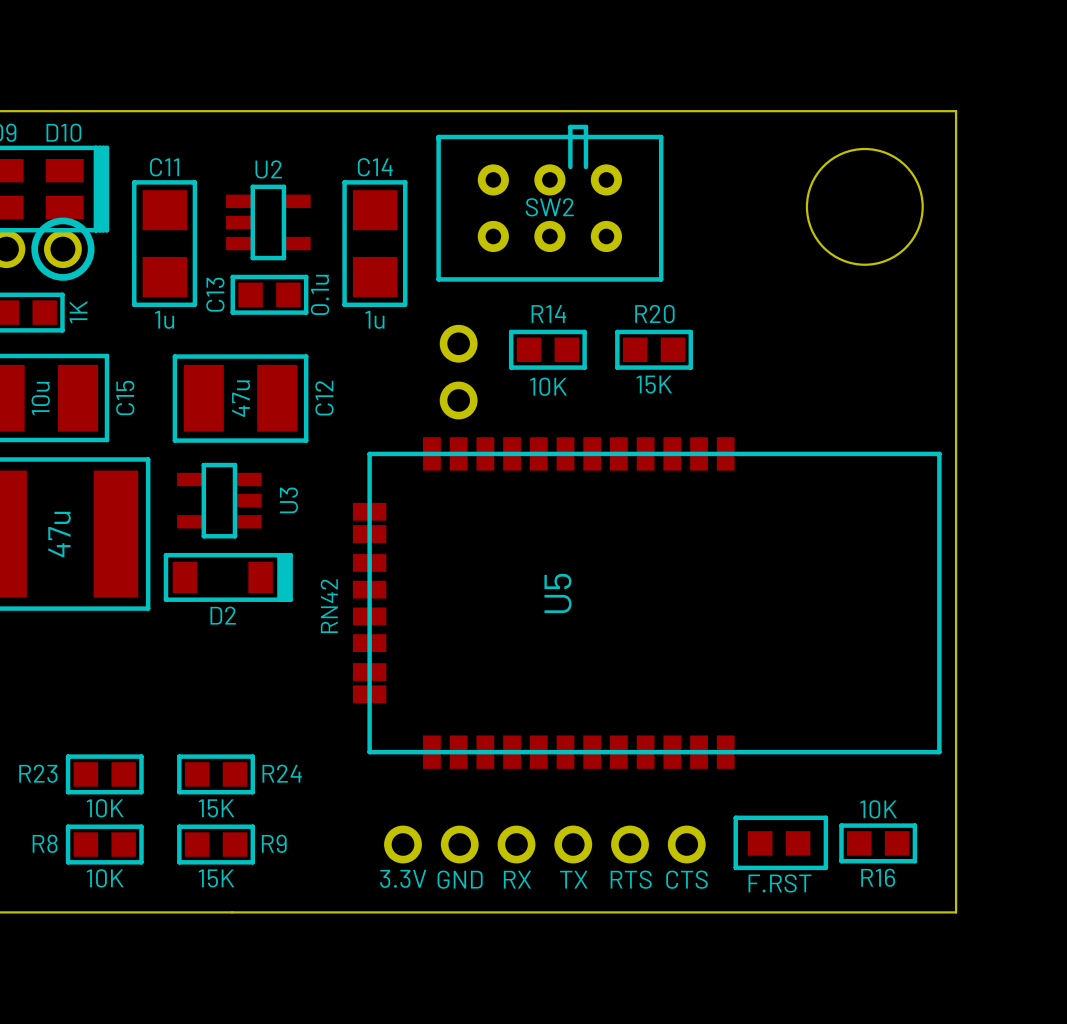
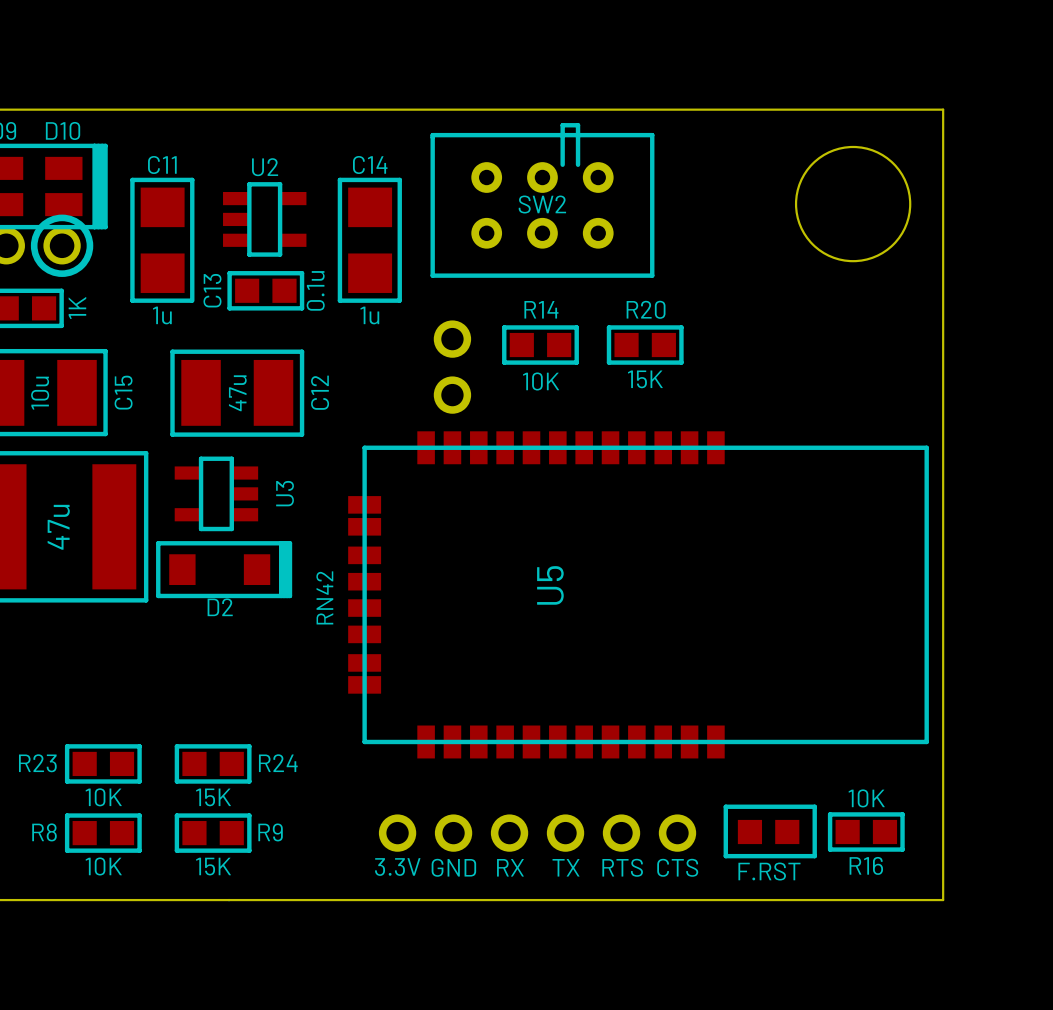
D2 footprint: [163, 552, 293, 602] -> [156, 541, 293, 599]

